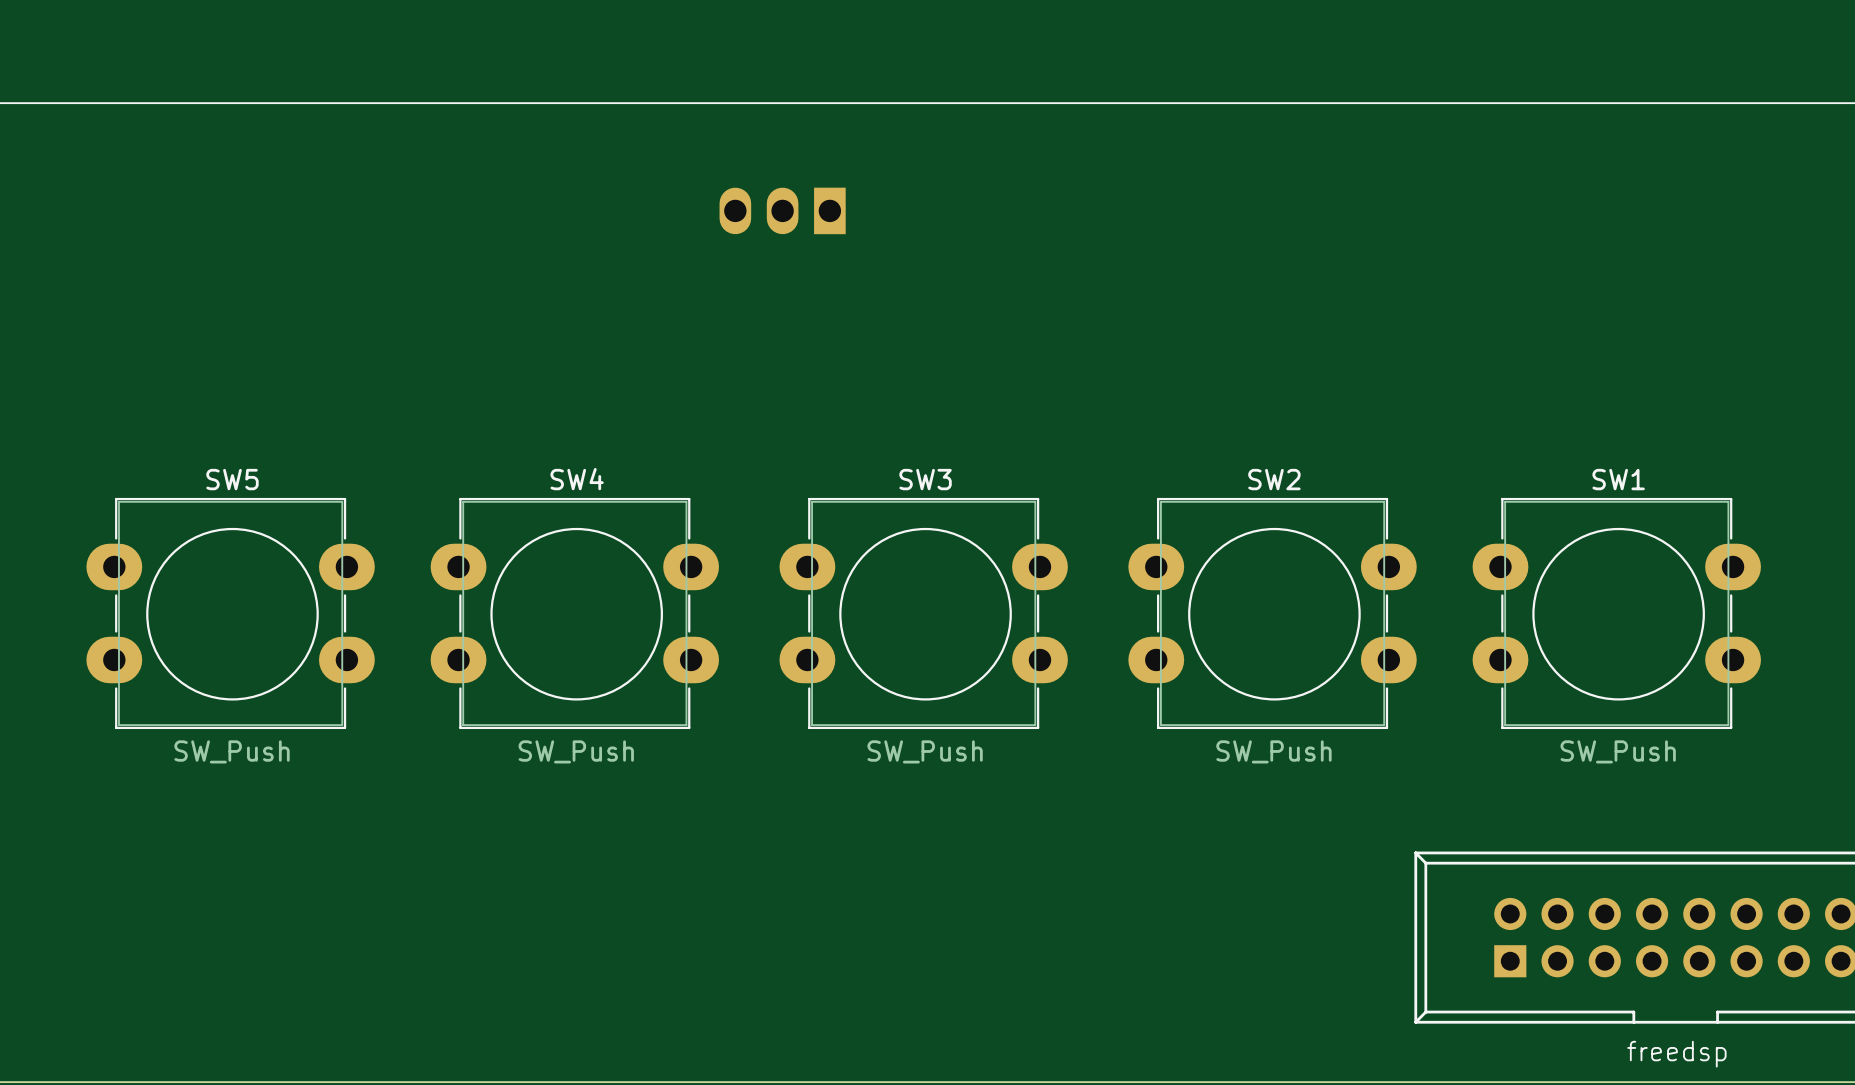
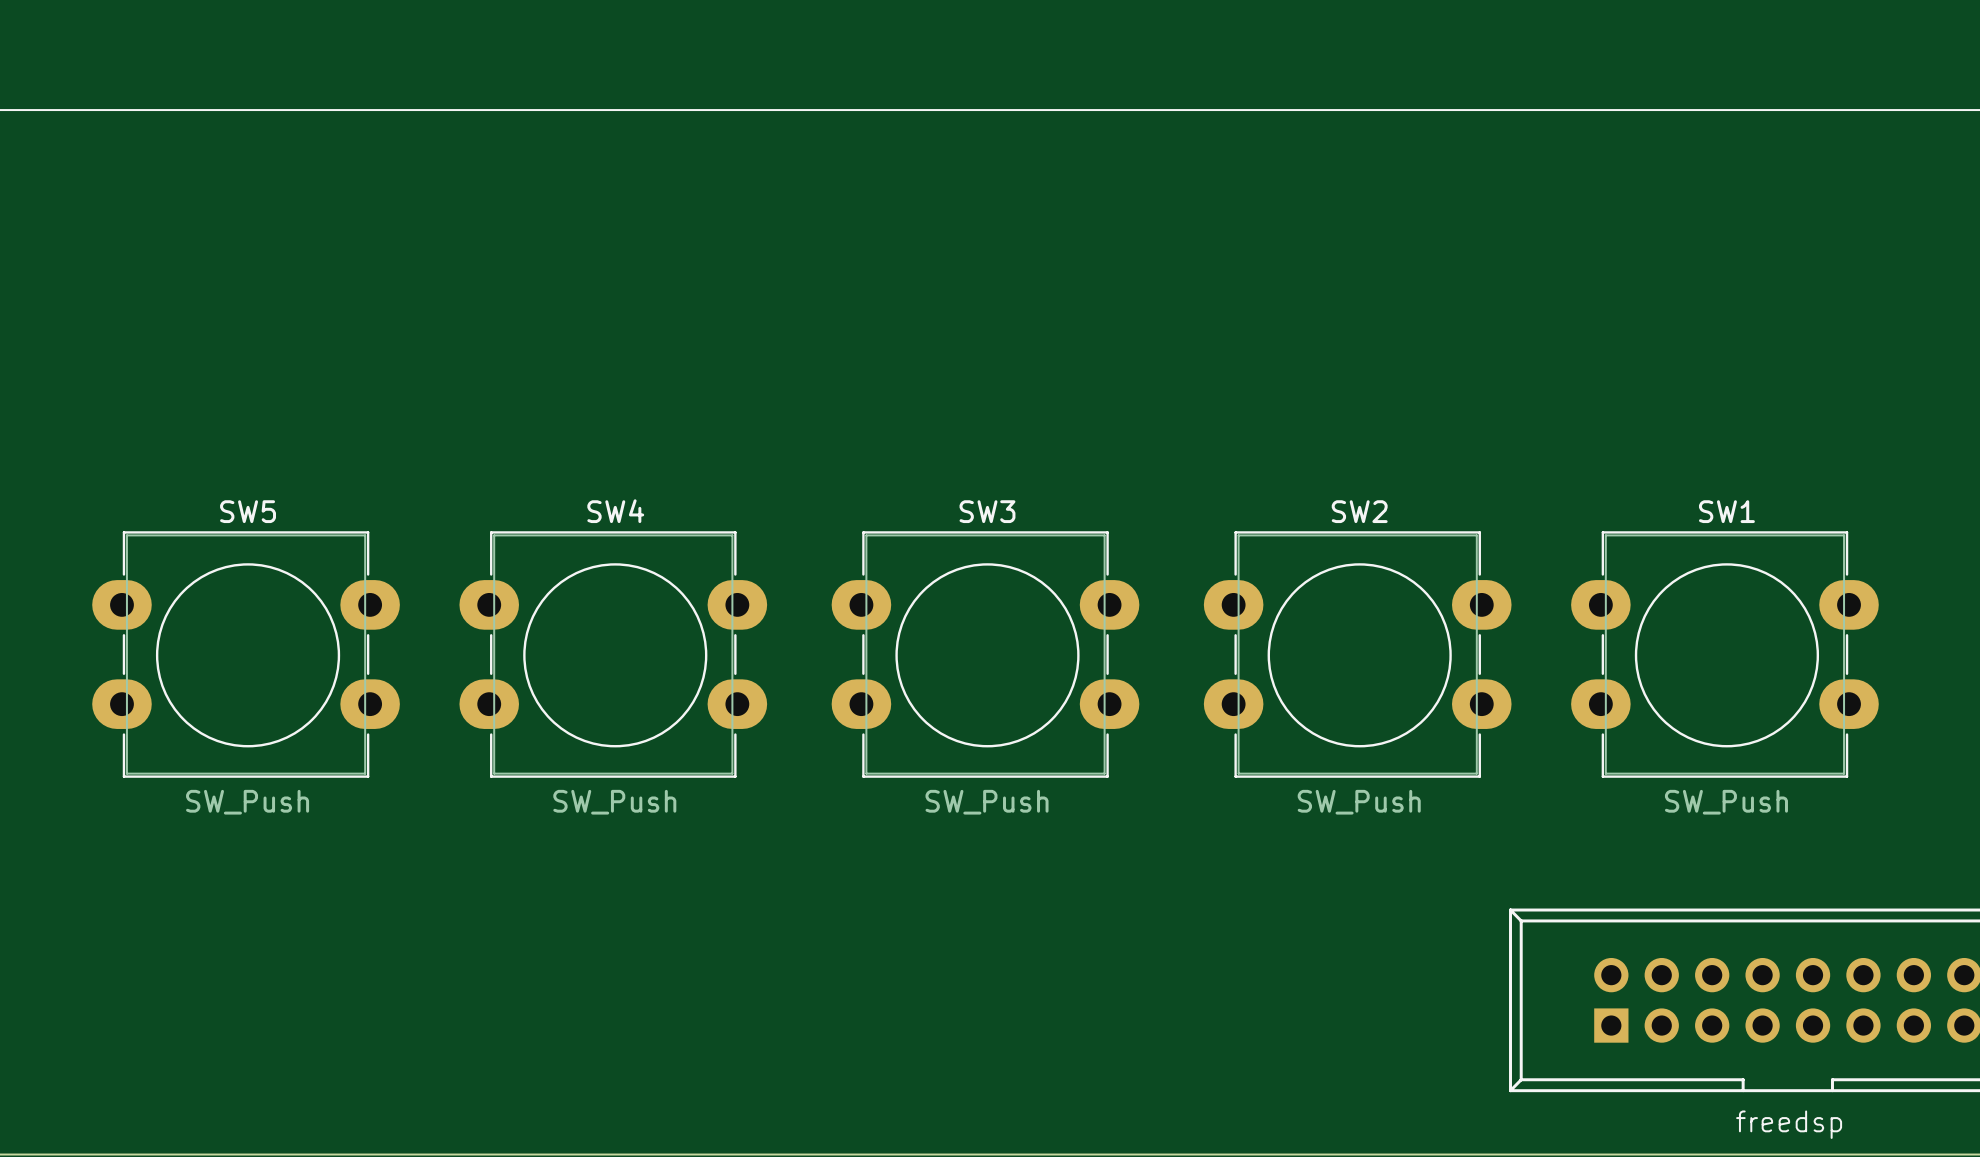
part: (782, 210) -> none

